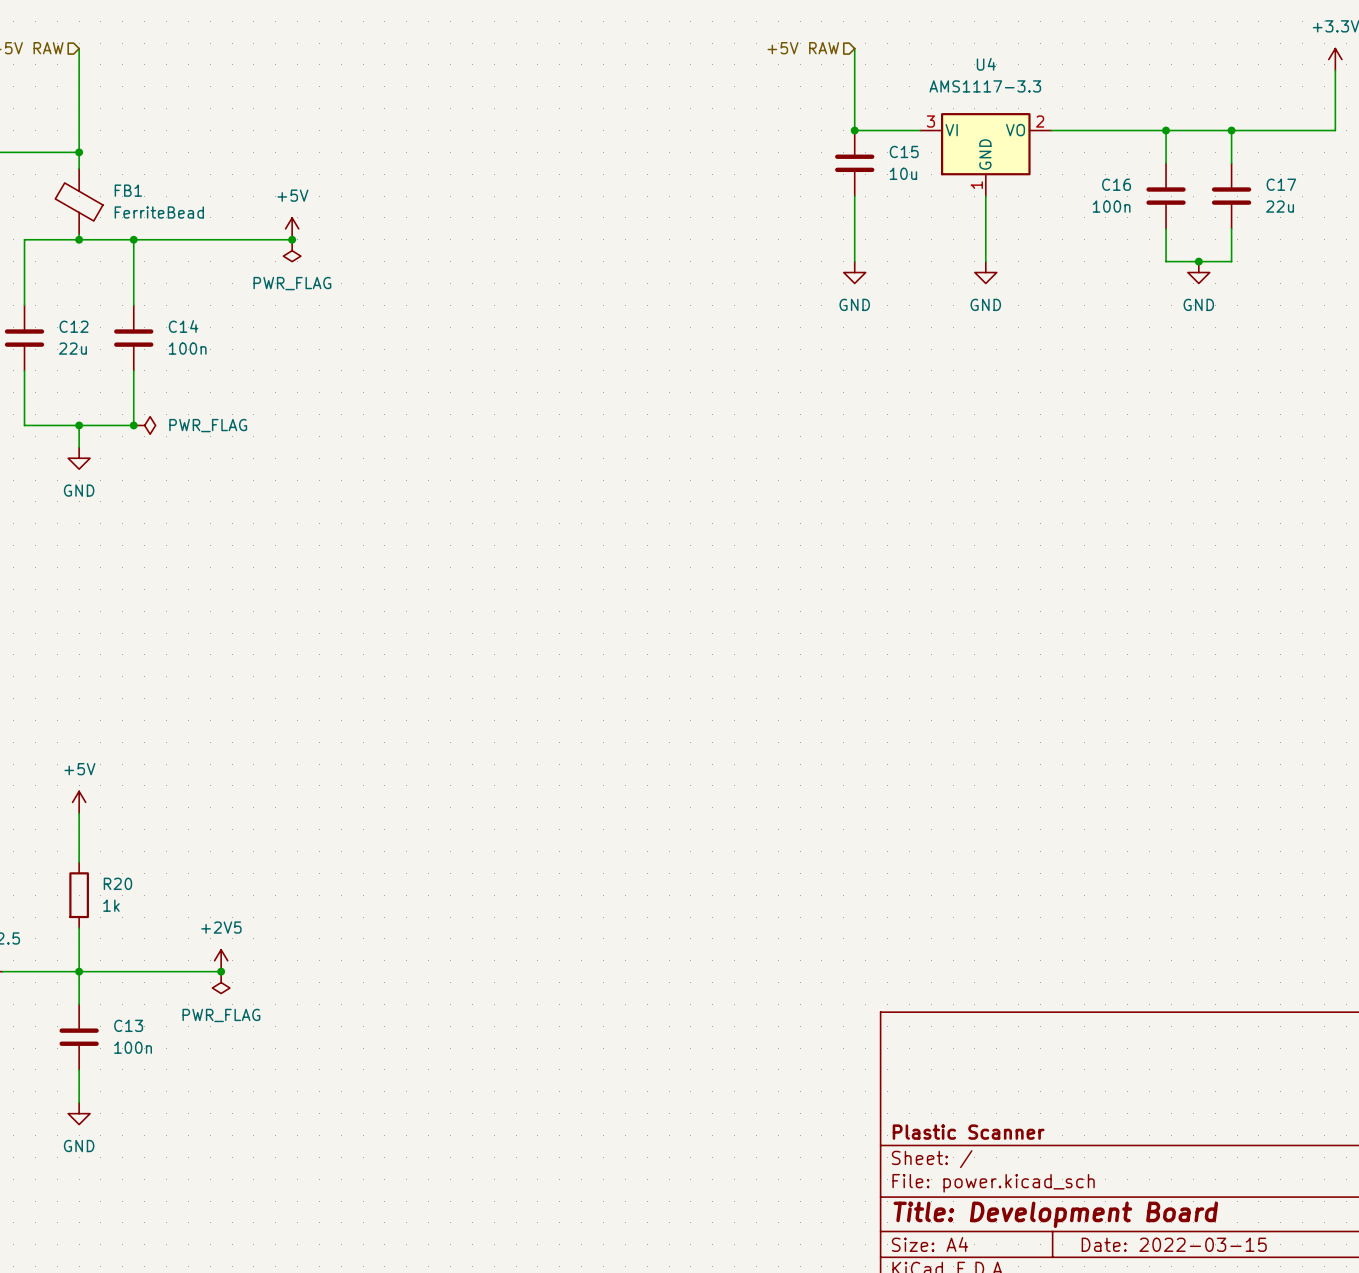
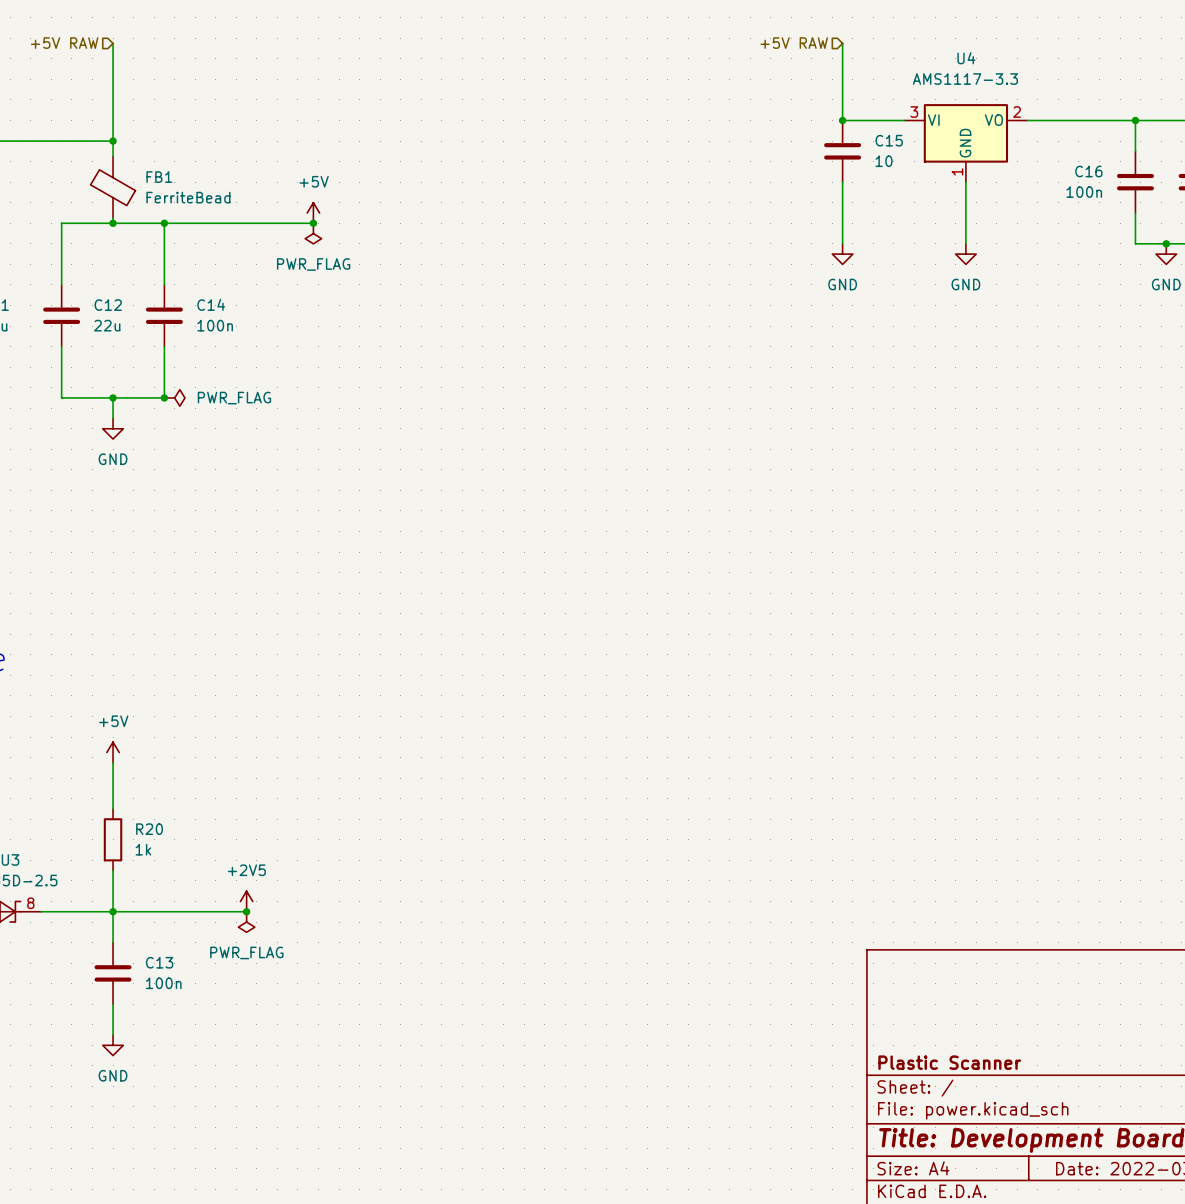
C15 value: 10u (903, 173) -> 10 (884, 161)

